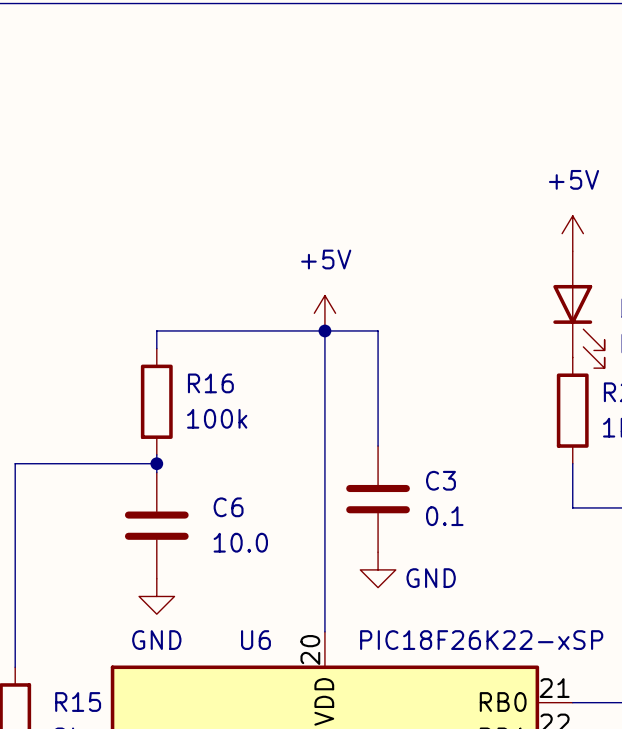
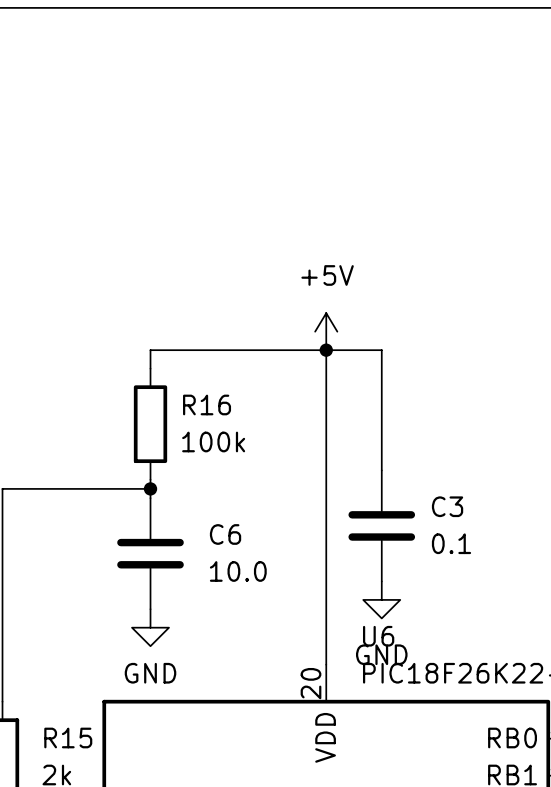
power symbol text position: GND (431, 578) -> GND (381, 654)
U6 name position: U6 (255, 640) -> U6 (378, 636)

